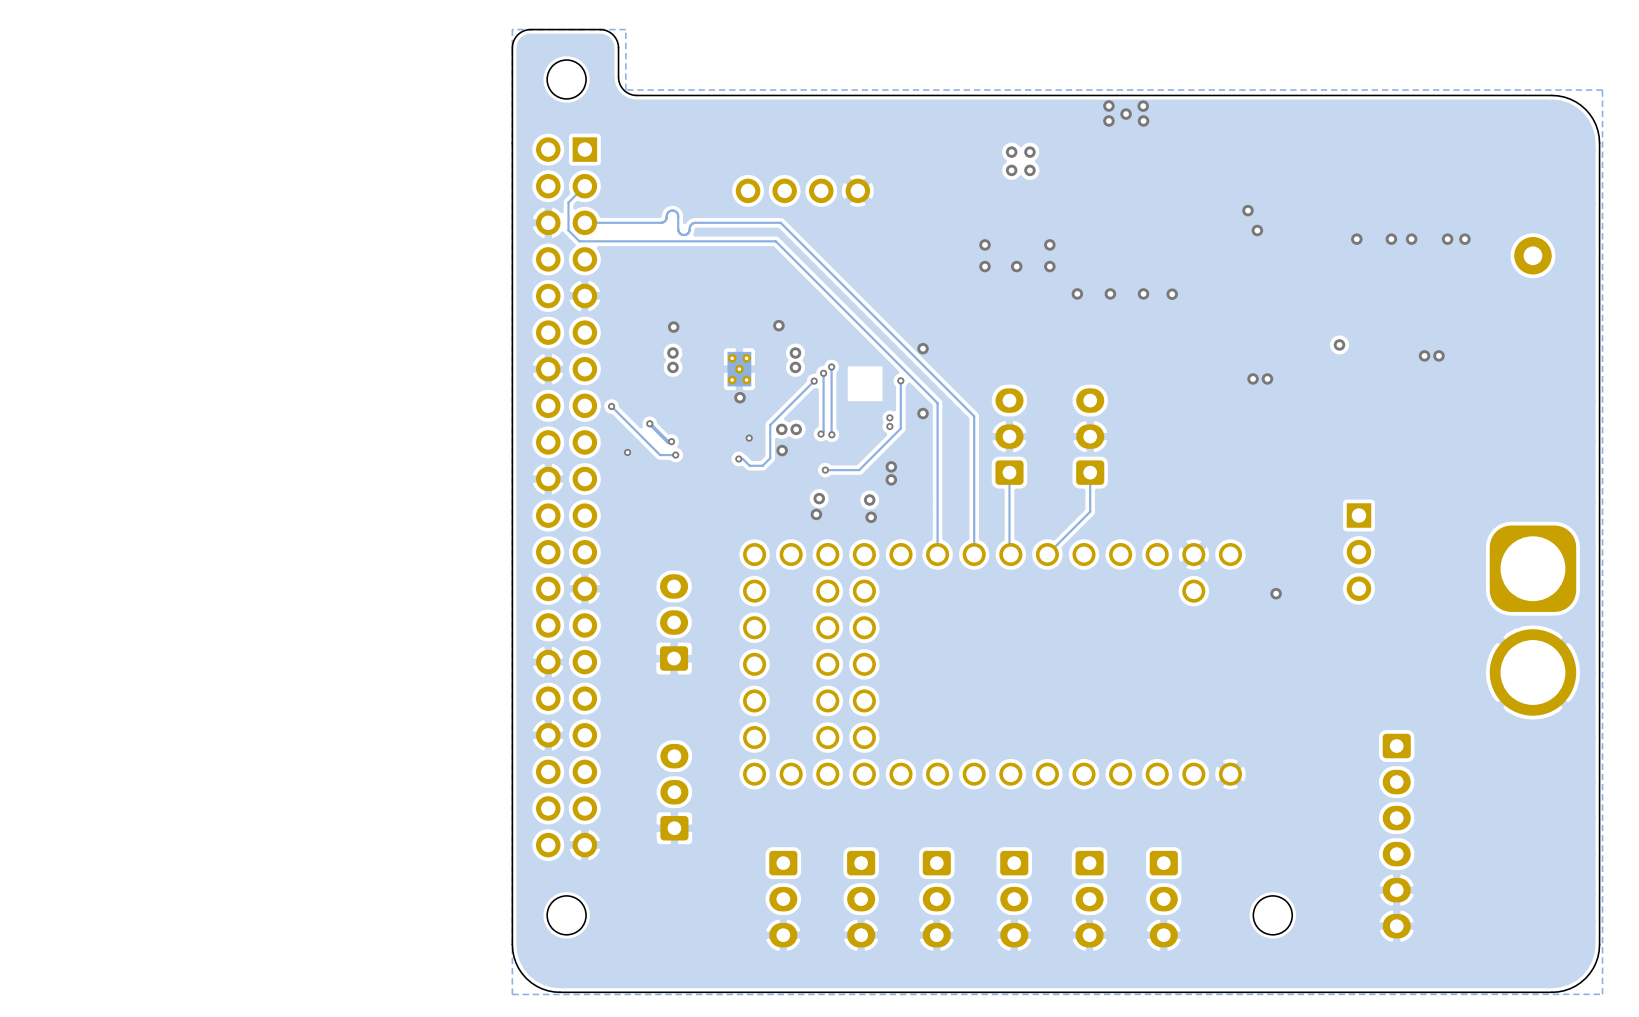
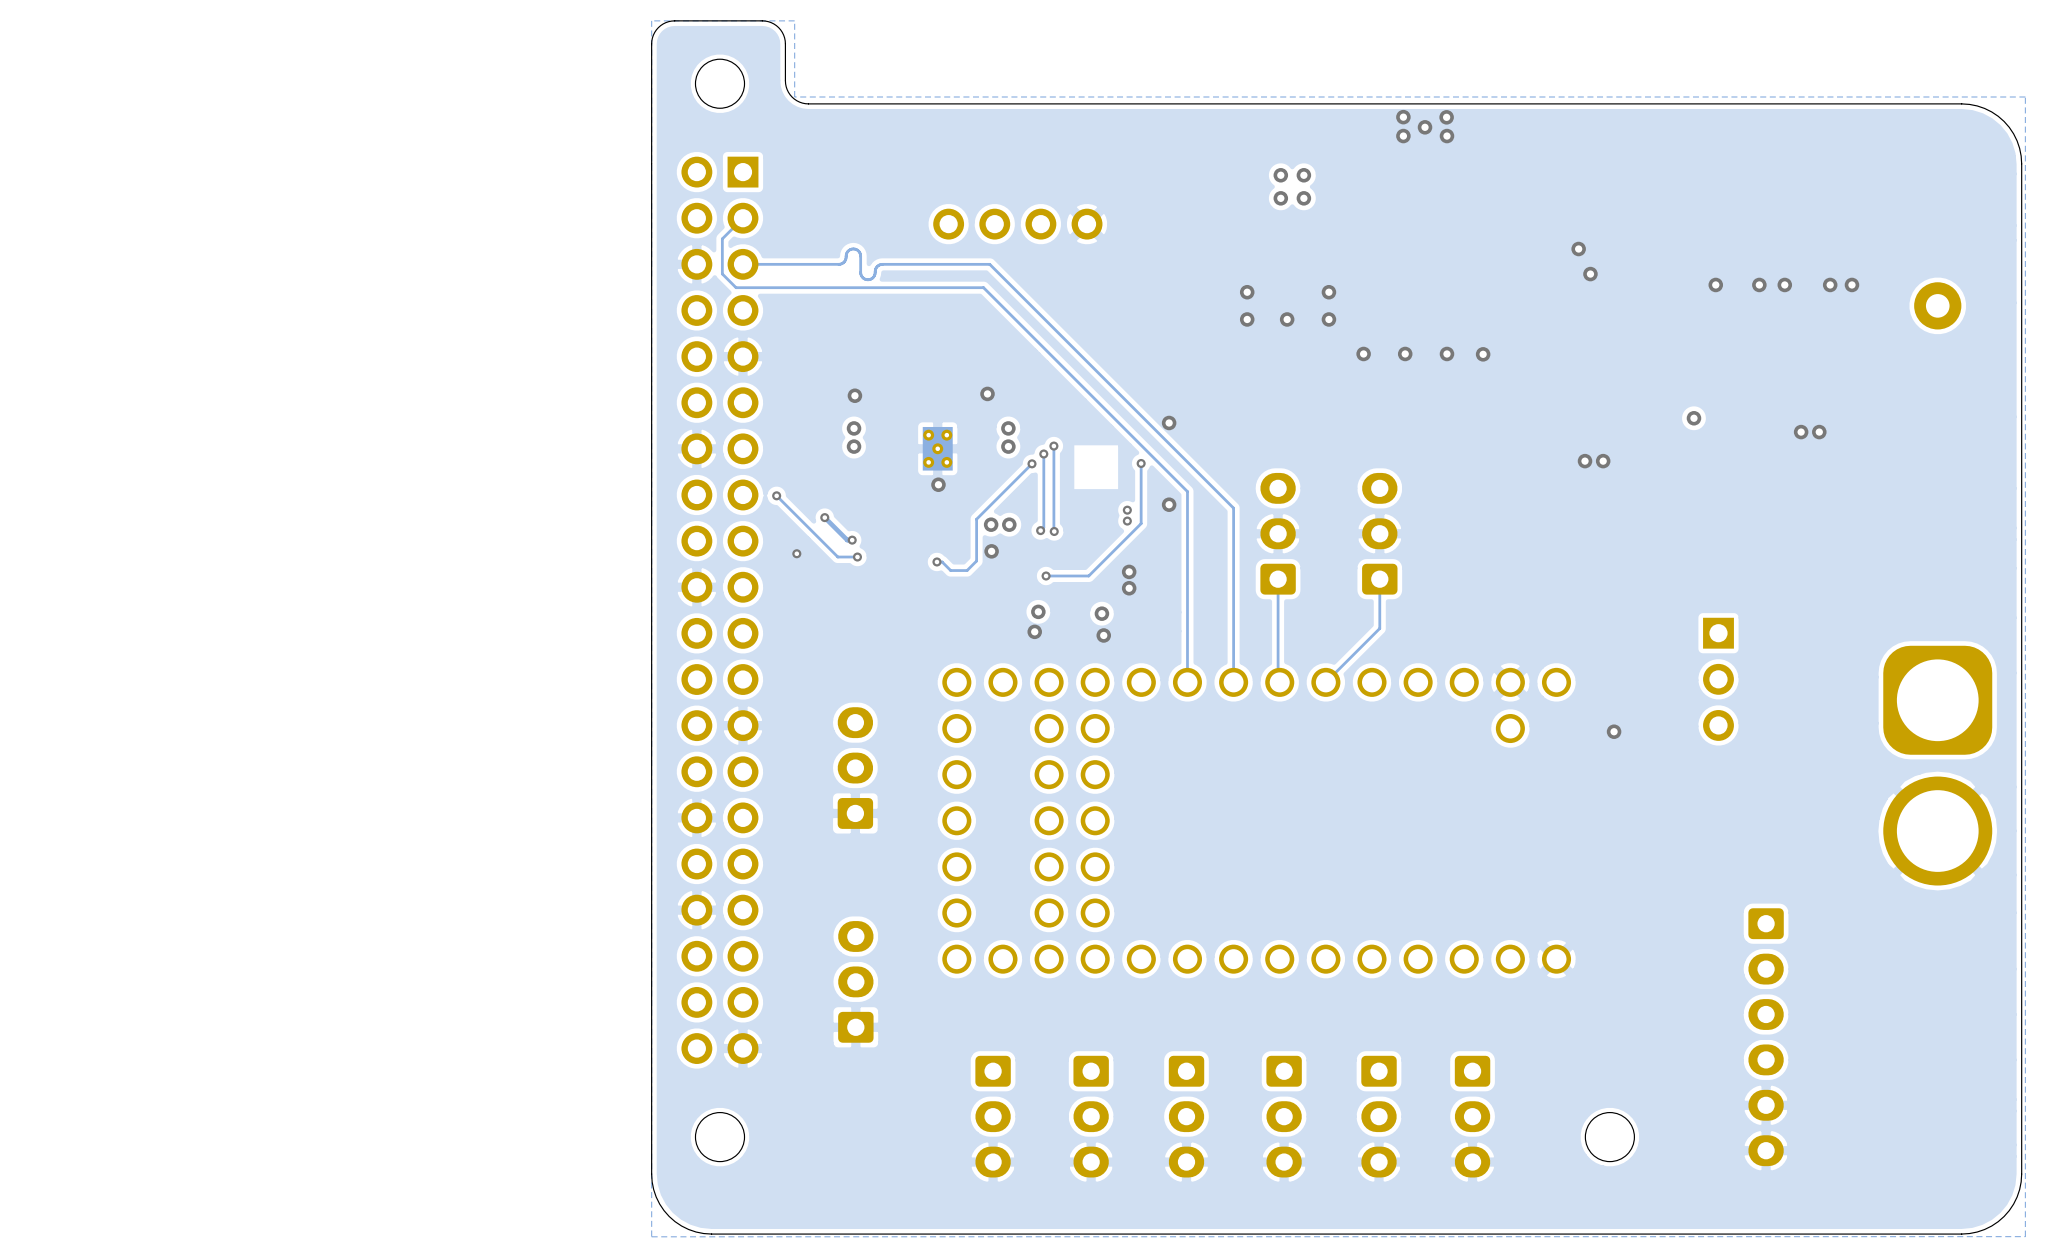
via: (749, 438) -> none

